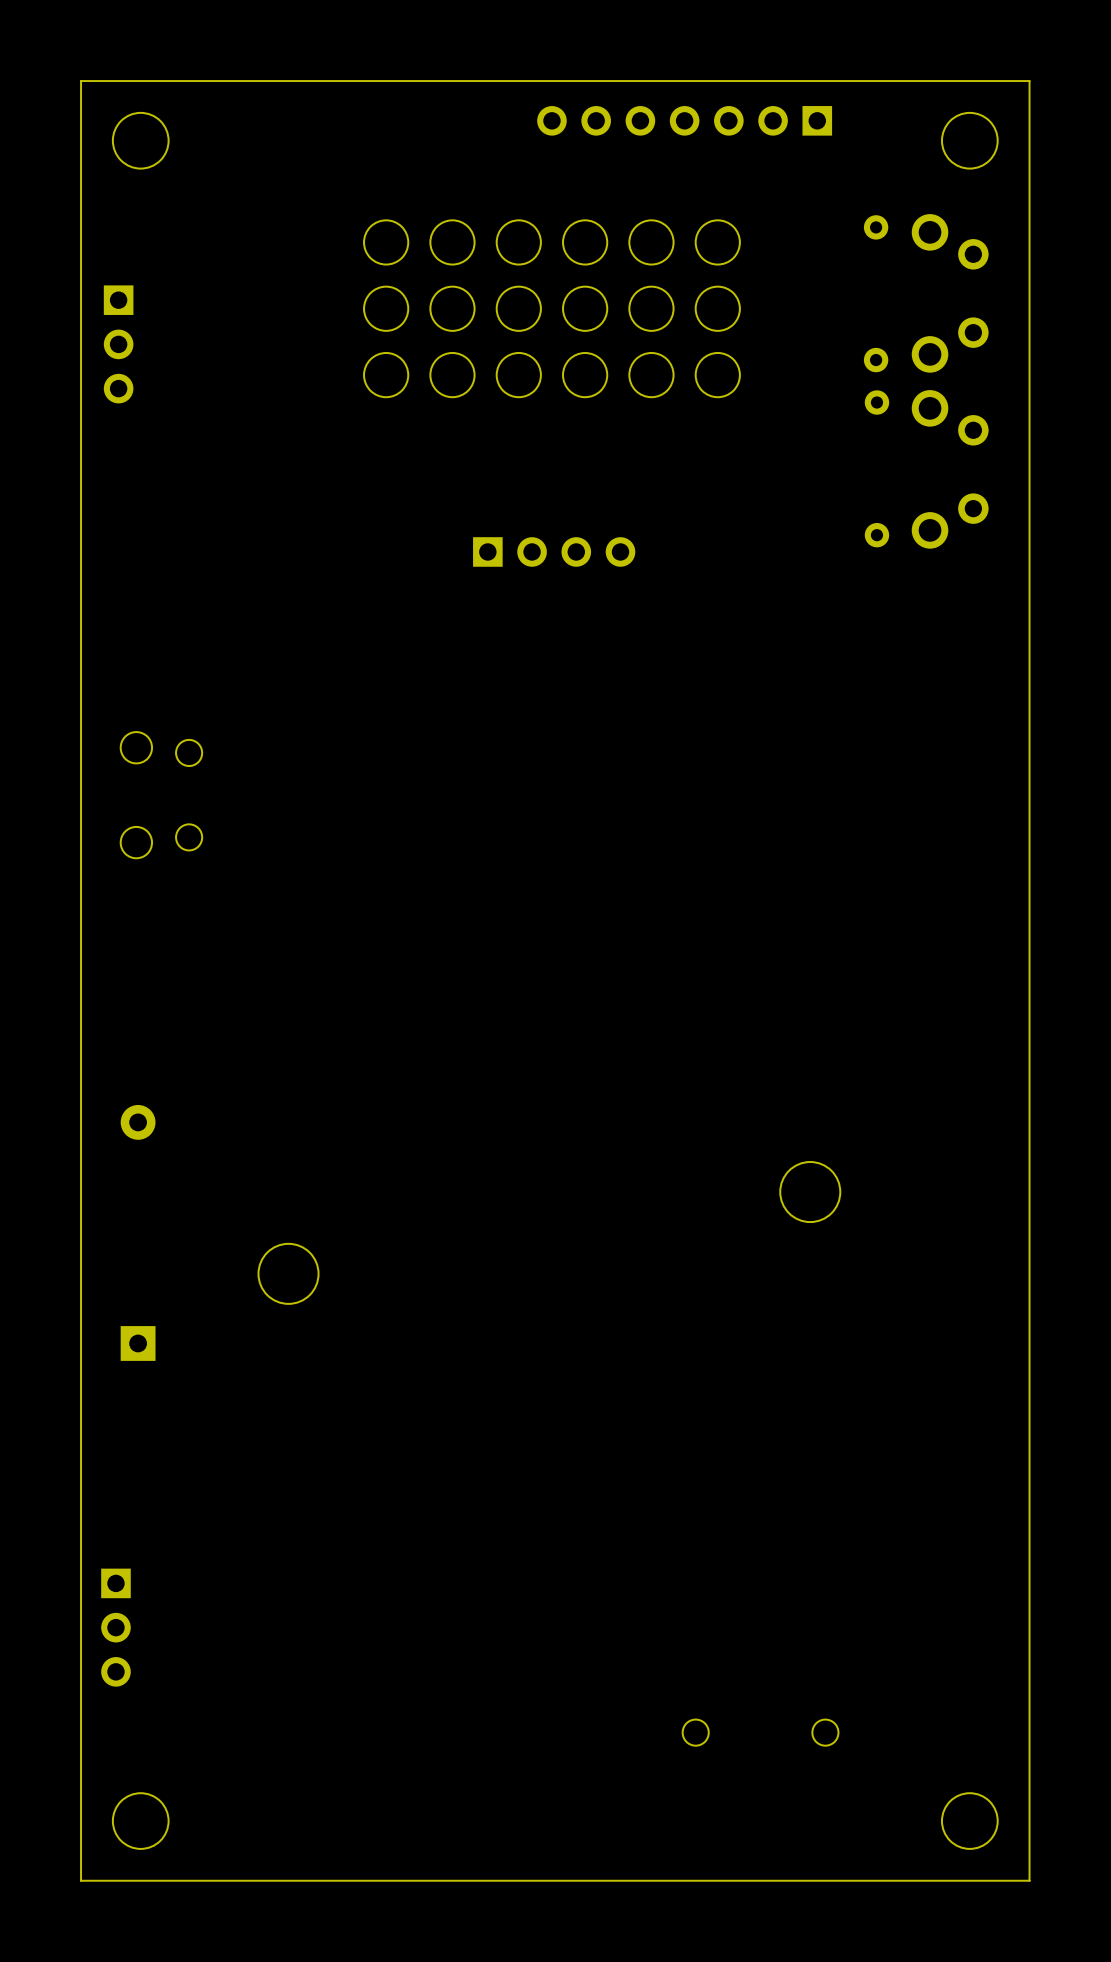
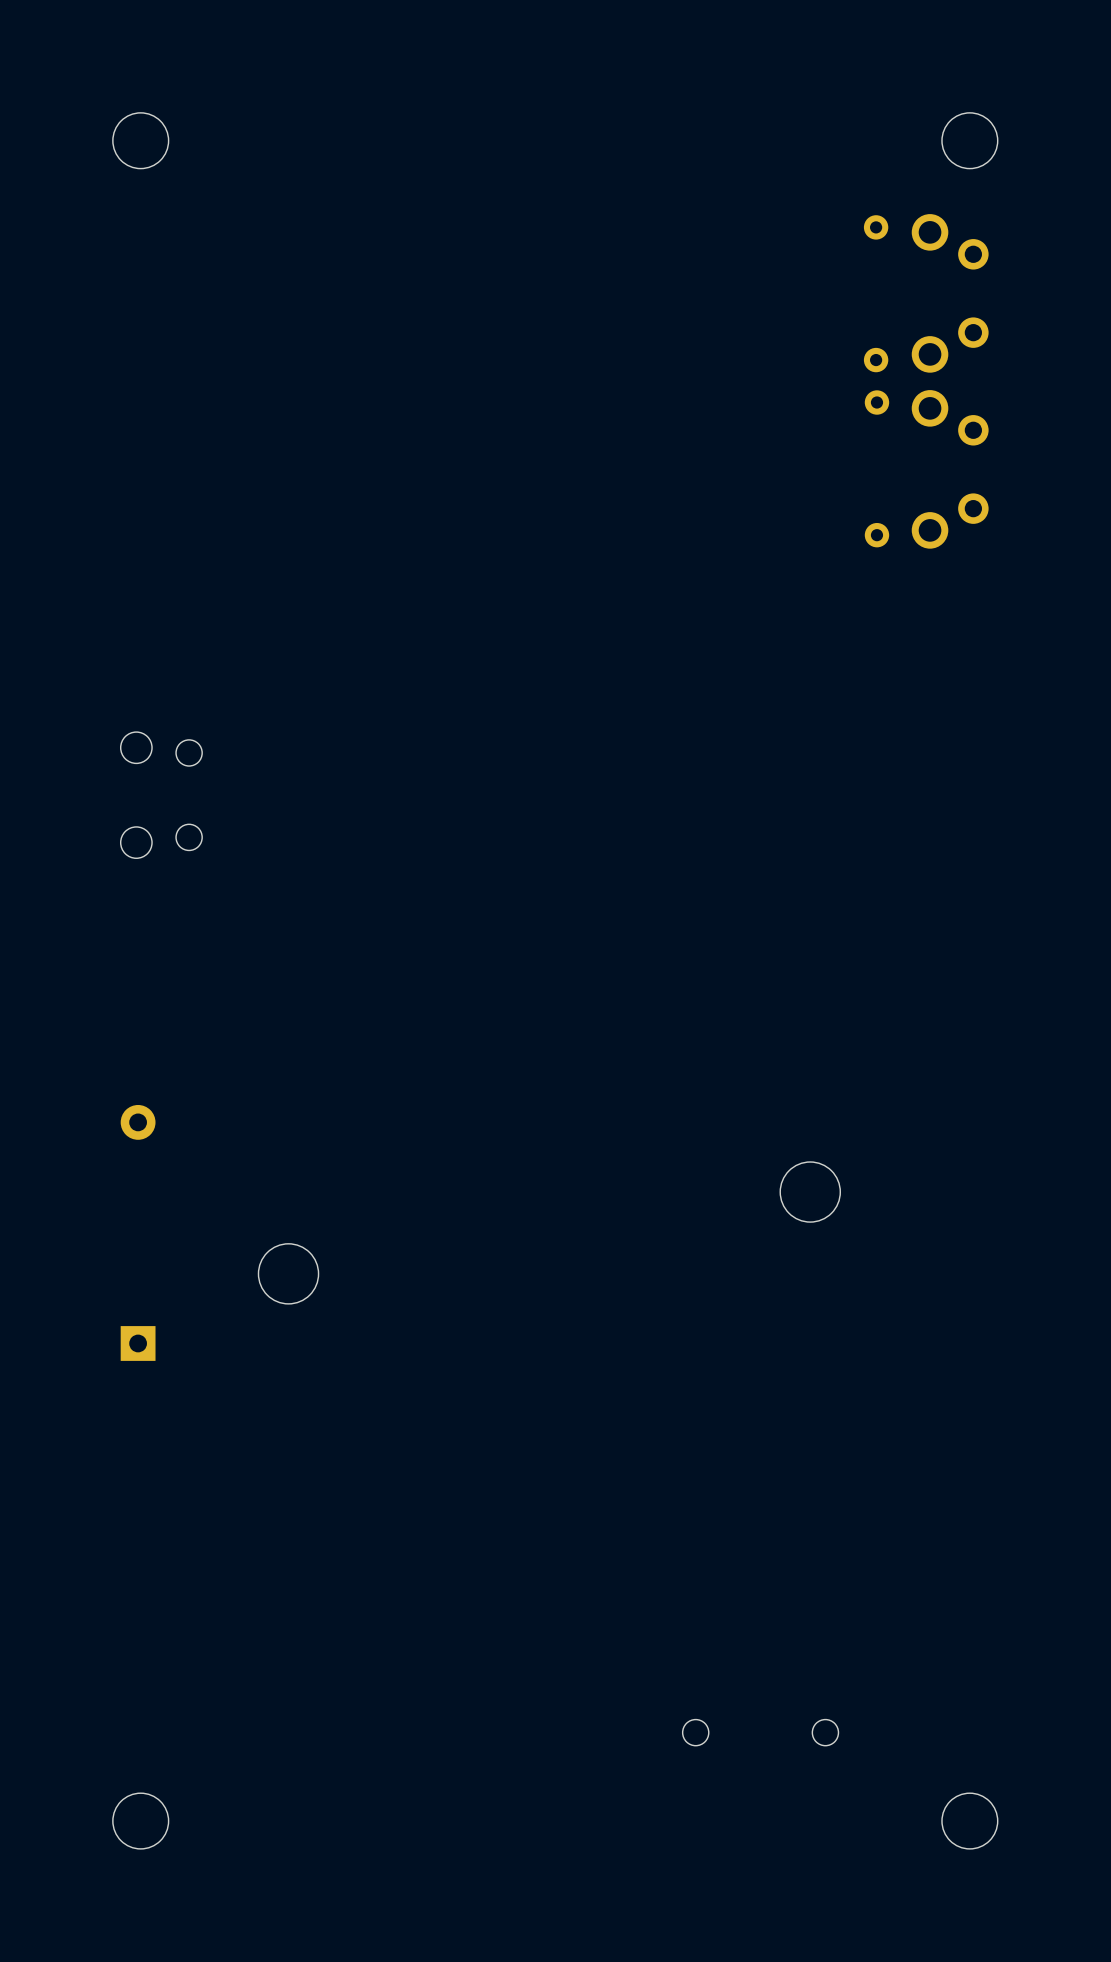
board edge: (1029, 81) (1029, 1880) (81, 1880) (81, 81) (1029, 81) -> none
part: (684, 120) -> none
round board edge: [363, 219, 410, 266] -> none
round board edge: [429, 219, 476, 266] -> none
round board edge: [495, 219, 542, 266] -> none
round board edge: [562, 219, 609, 266] -> none
round board edge: [628, 219, 675, 266] -> none
round board edge: [694, 219, 741, 266] -> none
round board edge: [363, 285, 410, 332] -> none
round board edge: [429, 285, 476, 332] -> none
round board edge: [495, 285, 542, 332] -> none
round board edge: [562, 285, 609, 332] -> none
round board edge: [628, 285, 675, 332] -> none
round board edge: [694, 285, 741, 332] -> none
part: (118, 344) -> none
round board edge: [363, 352, 410, 399] -> none
round board edge: [429, 352, 476, 399] -> none
round board edge: [495, 352, 542, 399] -> none
round board edge: [562, 352, 609, 399] -> none
round board edge: [628, 352, 675, 399] -> none
round board edge: [694, 352, 741, 399] -> none
part: (554, 551) -> none
part: (115, 1627) -> none

